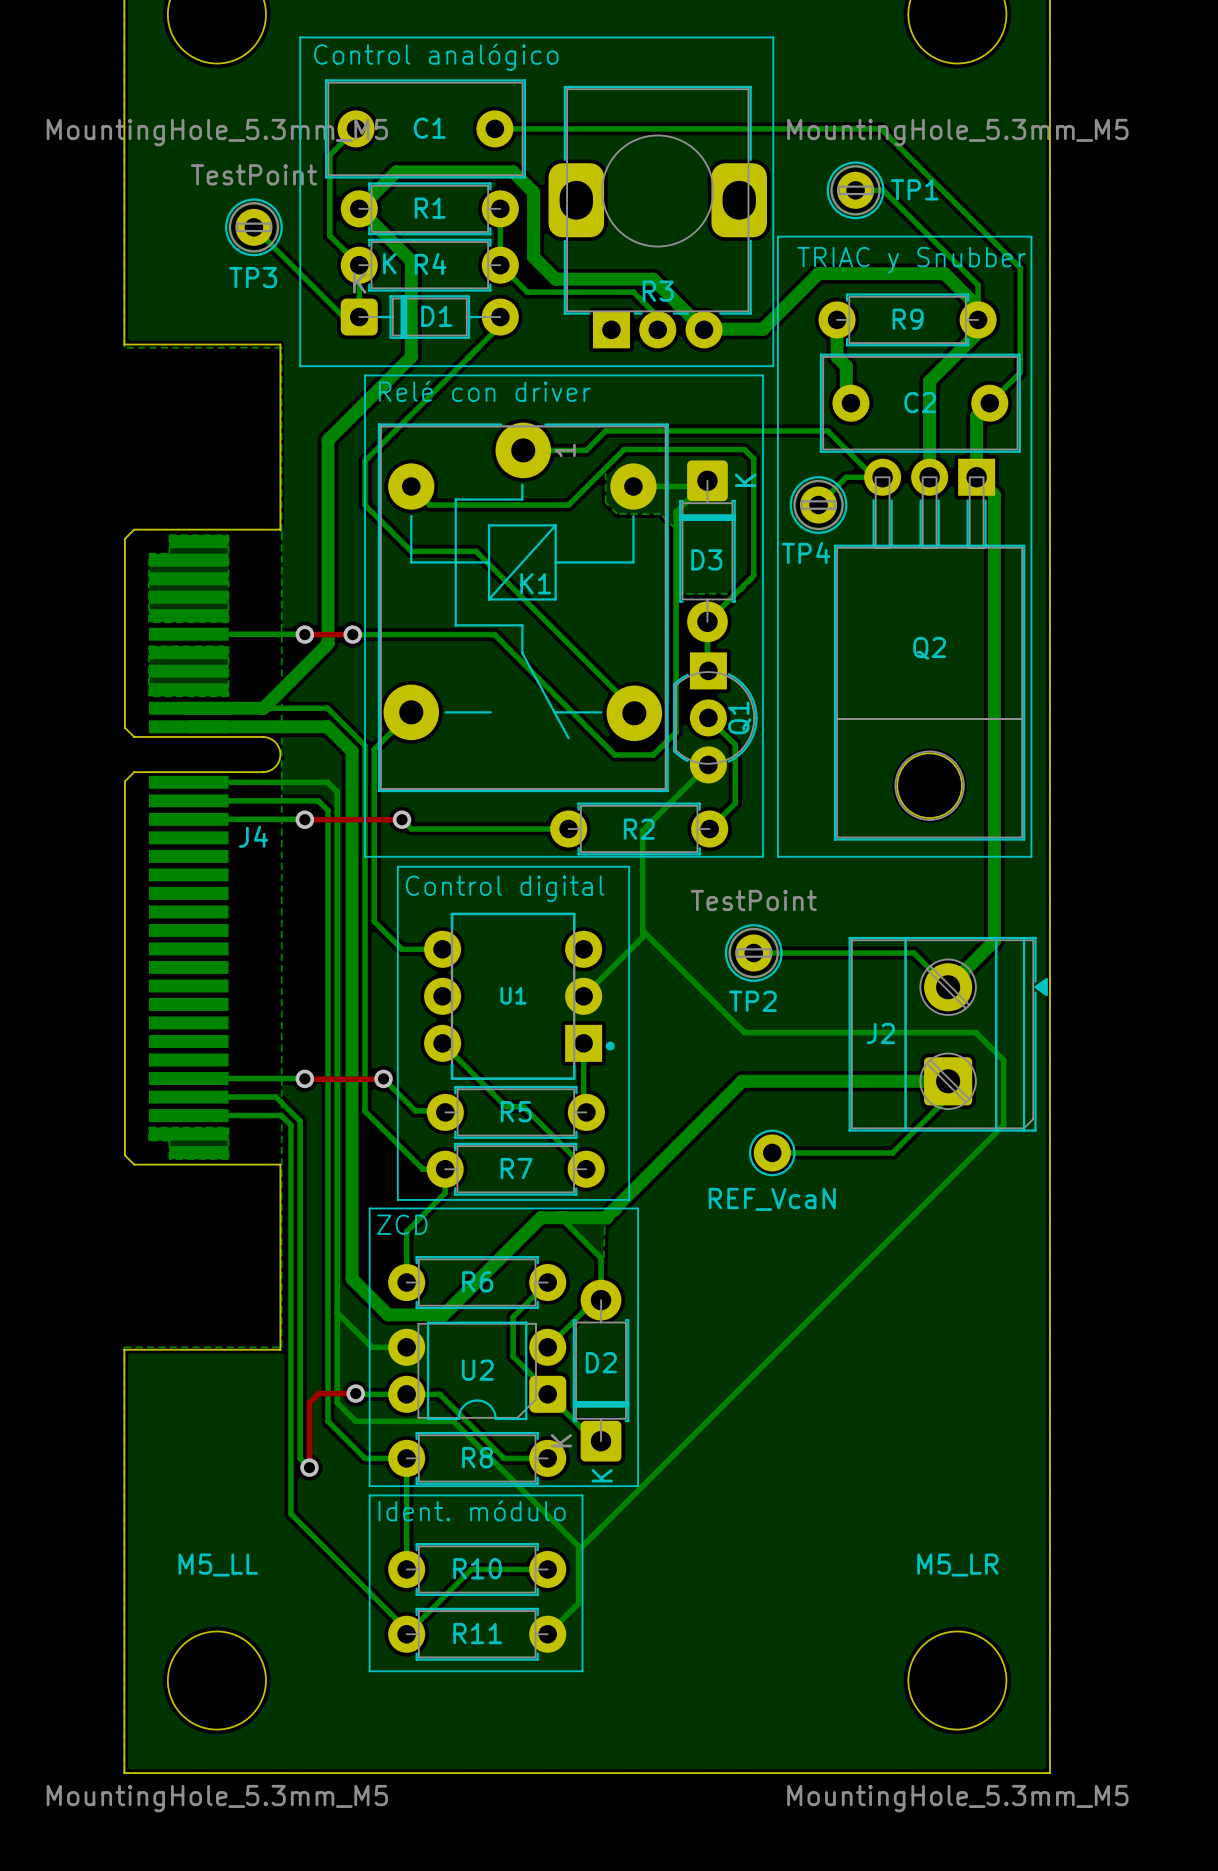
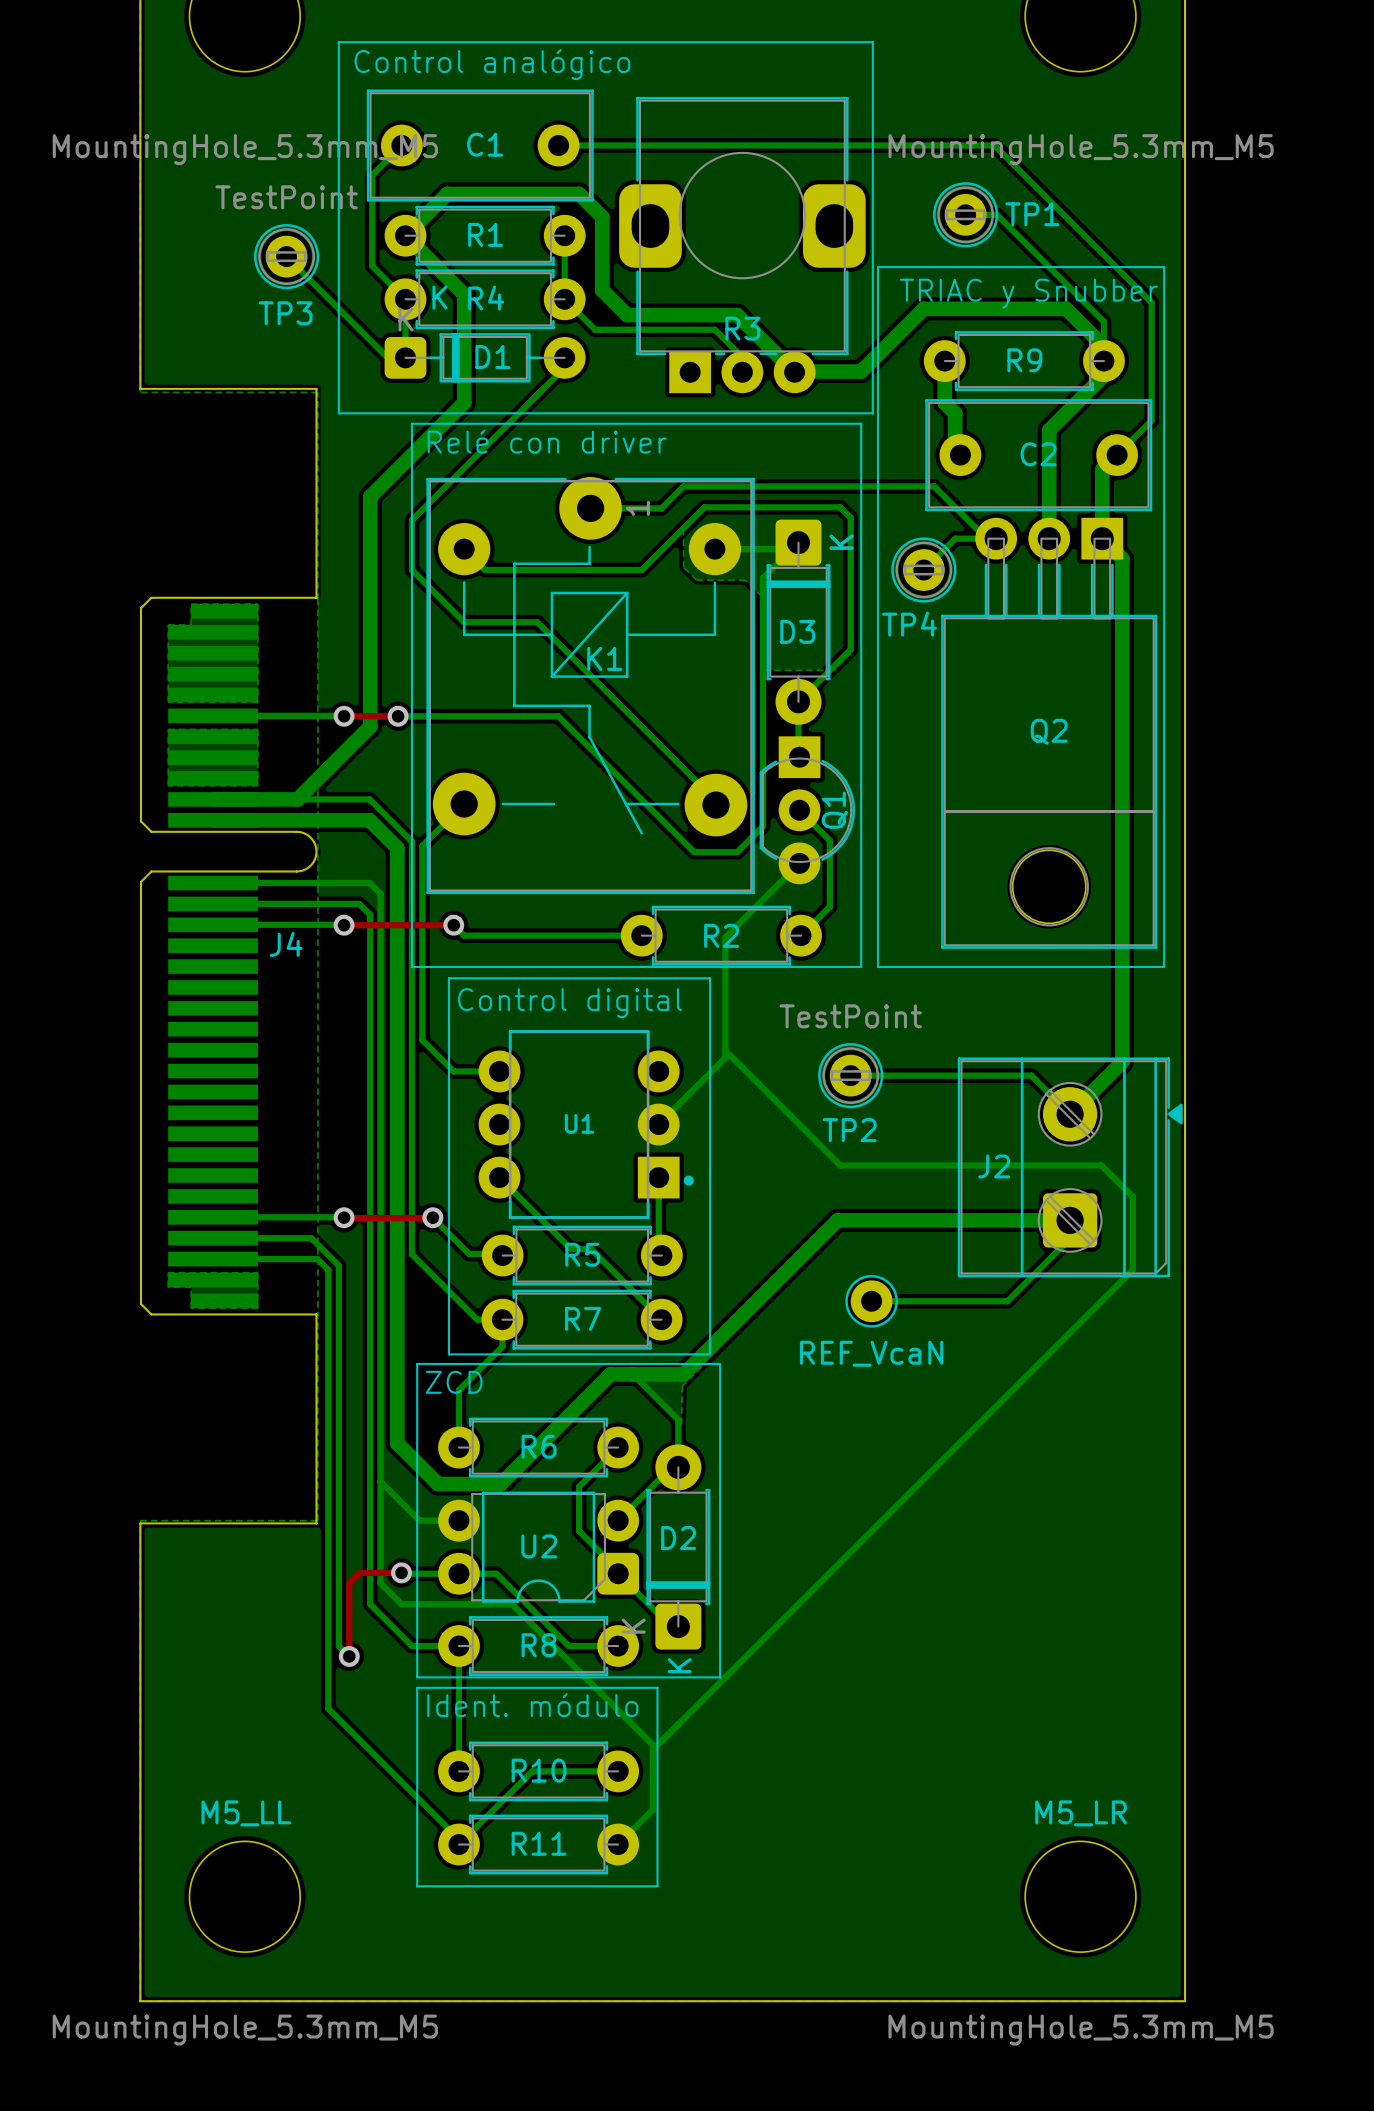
M5_LL name position: M5_LL (218, 1565) -> M5_LL (246, 1813)
M5_LR name position: M5_LR (957, 1565) -> M5_LR (1081, 1813)

